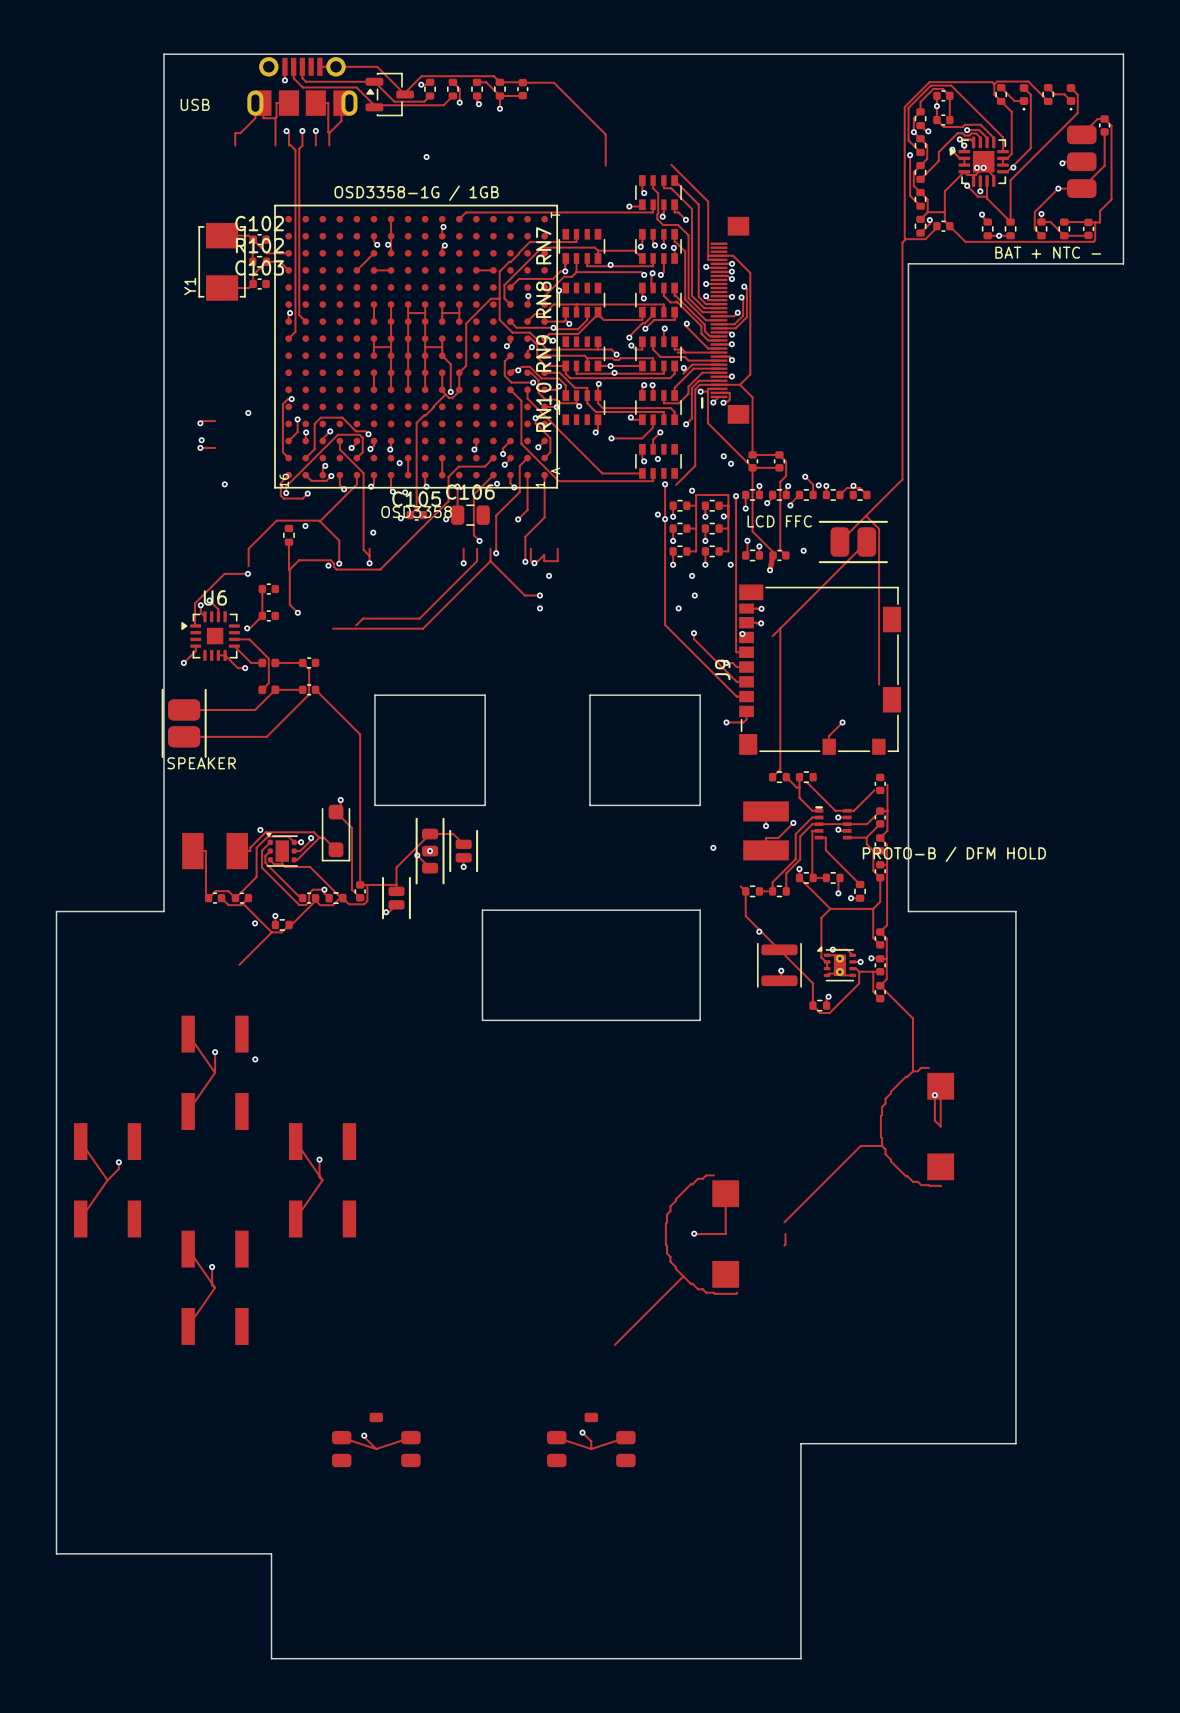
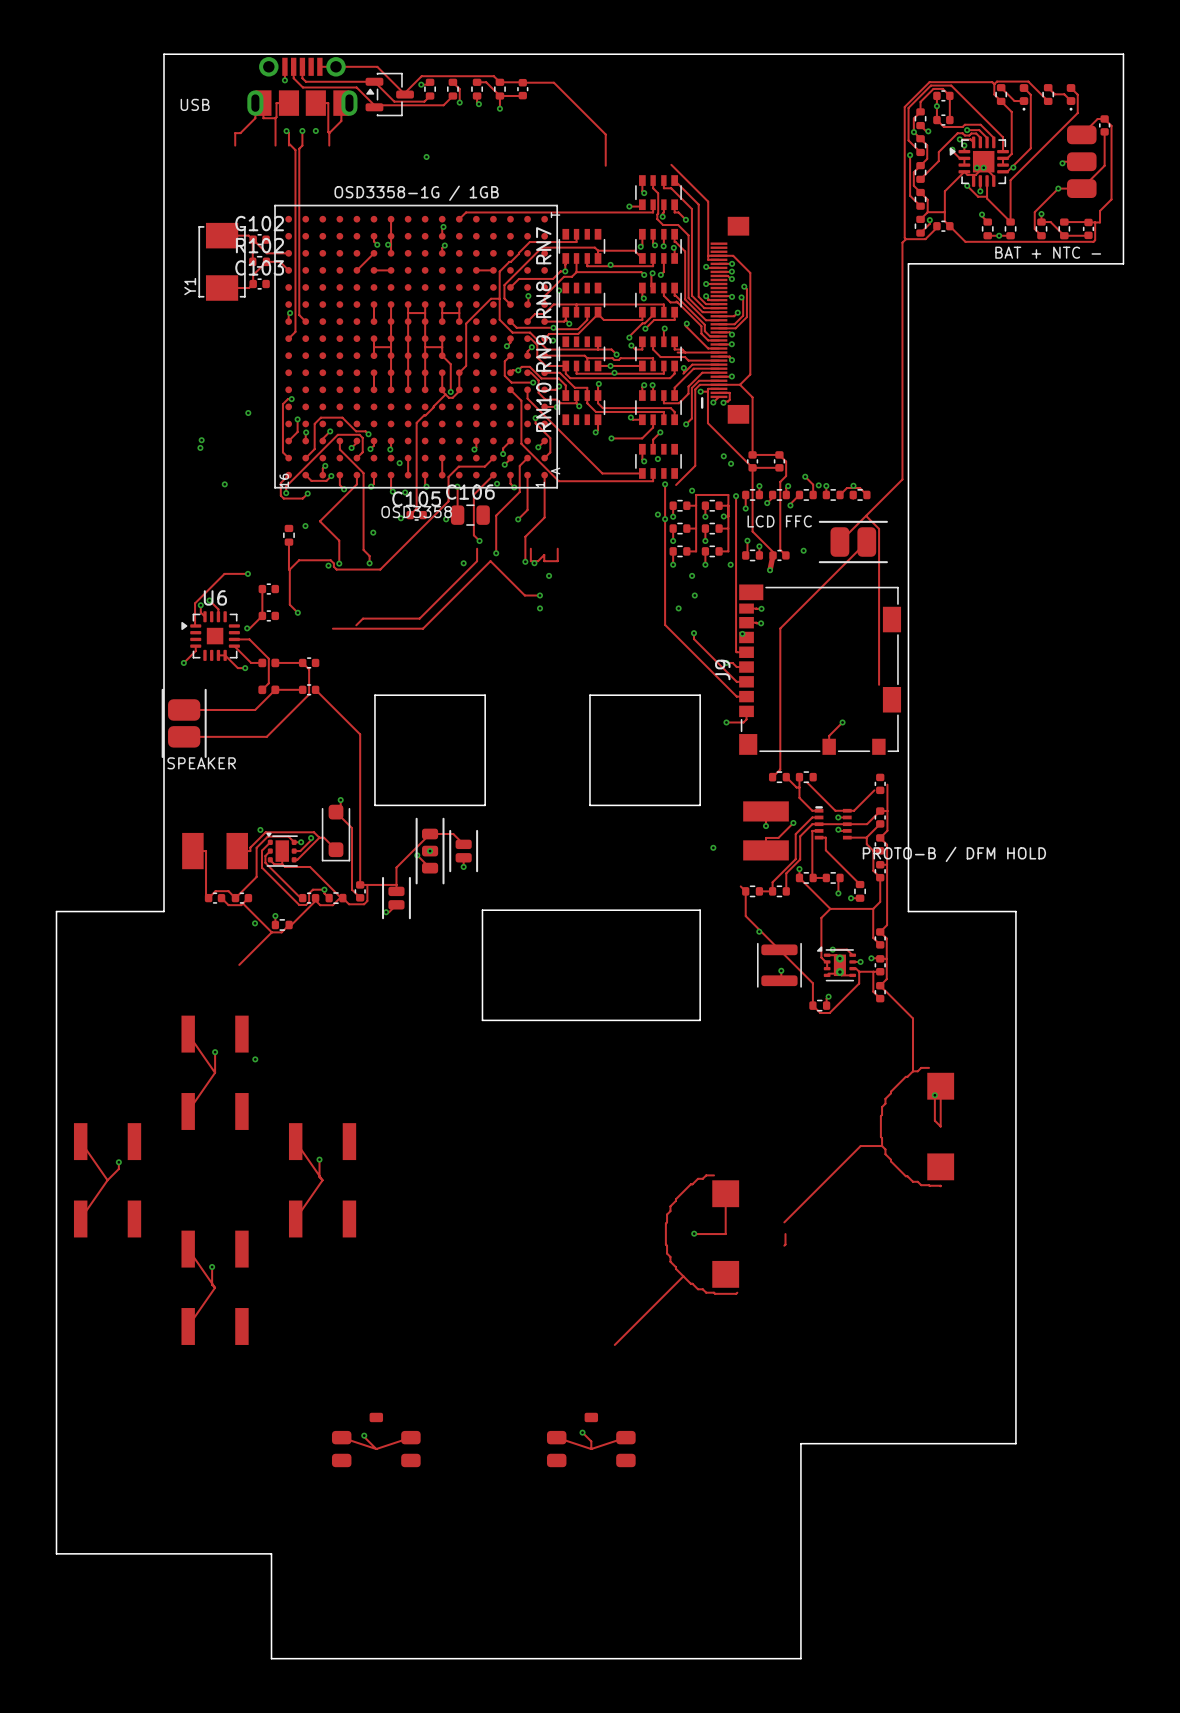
track: (315, 130) (315, 145) -> none
track: (215, 421) (202, 421) (200, 423) -> none
via: (200, 423) -> none
track: (200, 447) (215, 447) -> none
track: (319, 521) (276, 520) (248, 548) (248, 566) -> none
track: (369, 548) (369, 556) -> none
track: (463, 548) (463, 563) -> none
track: (490, 548) (490, 561) -> none
track: (780, 628) (772, 636) -> none

